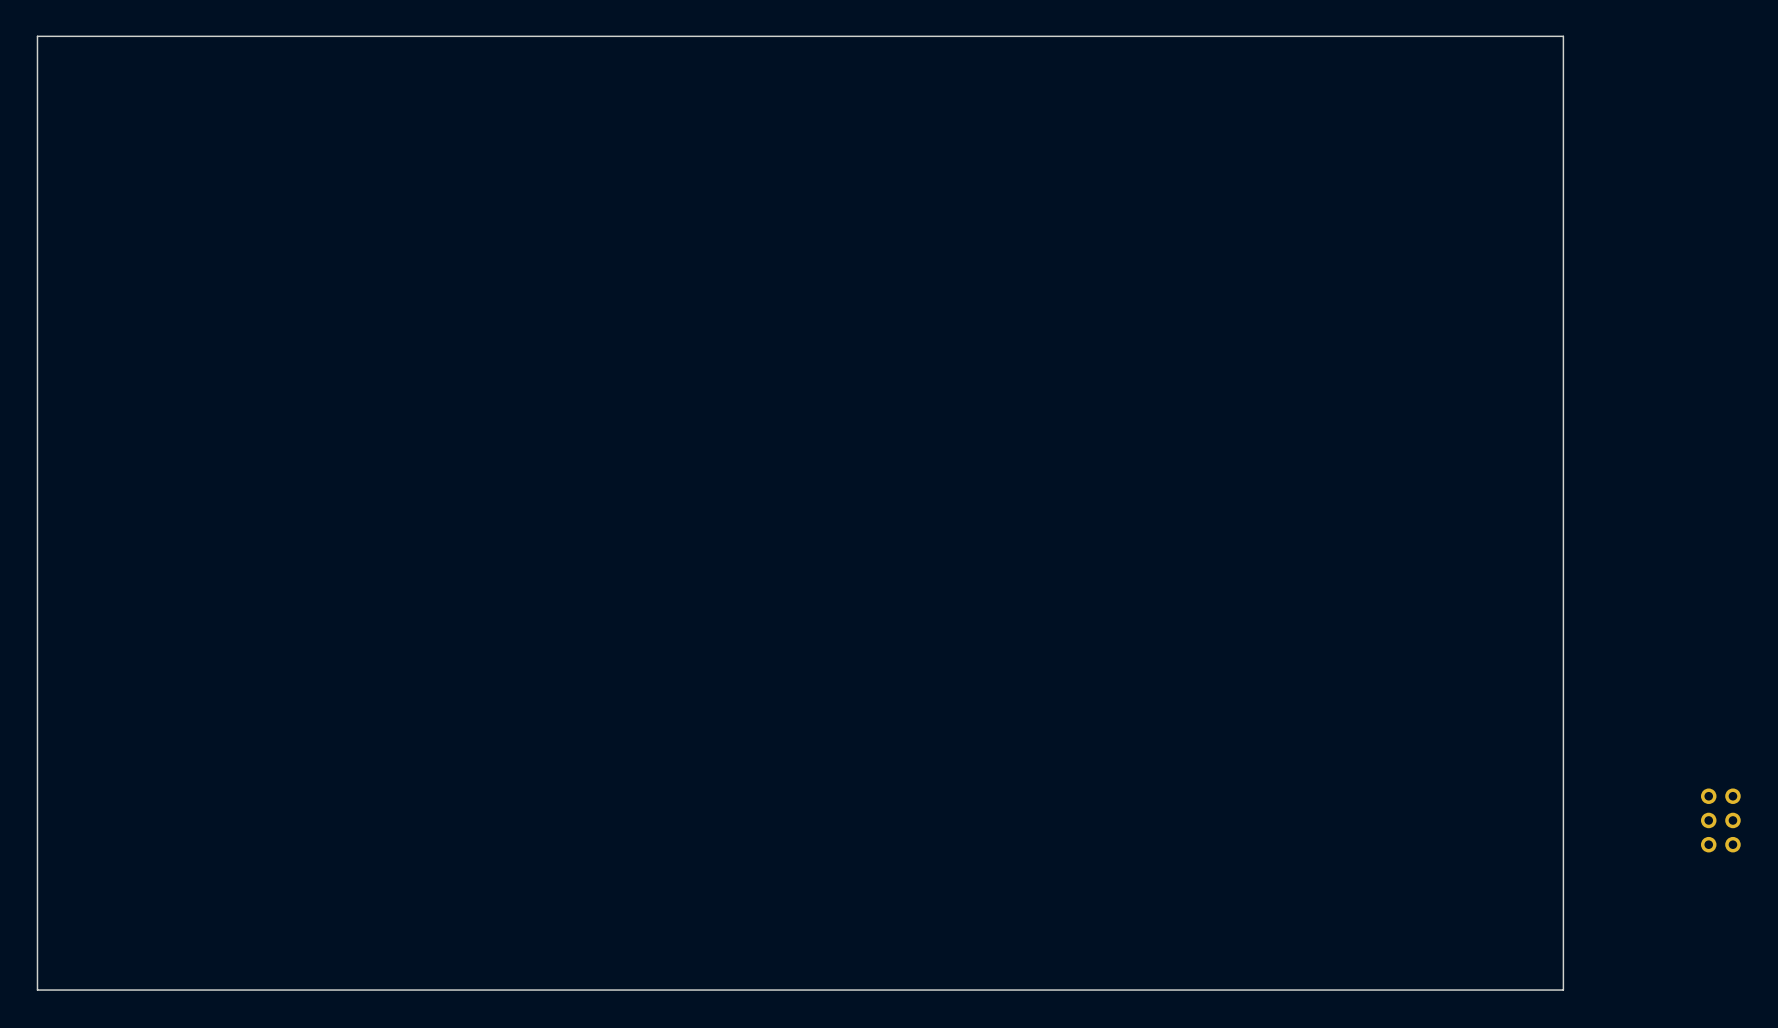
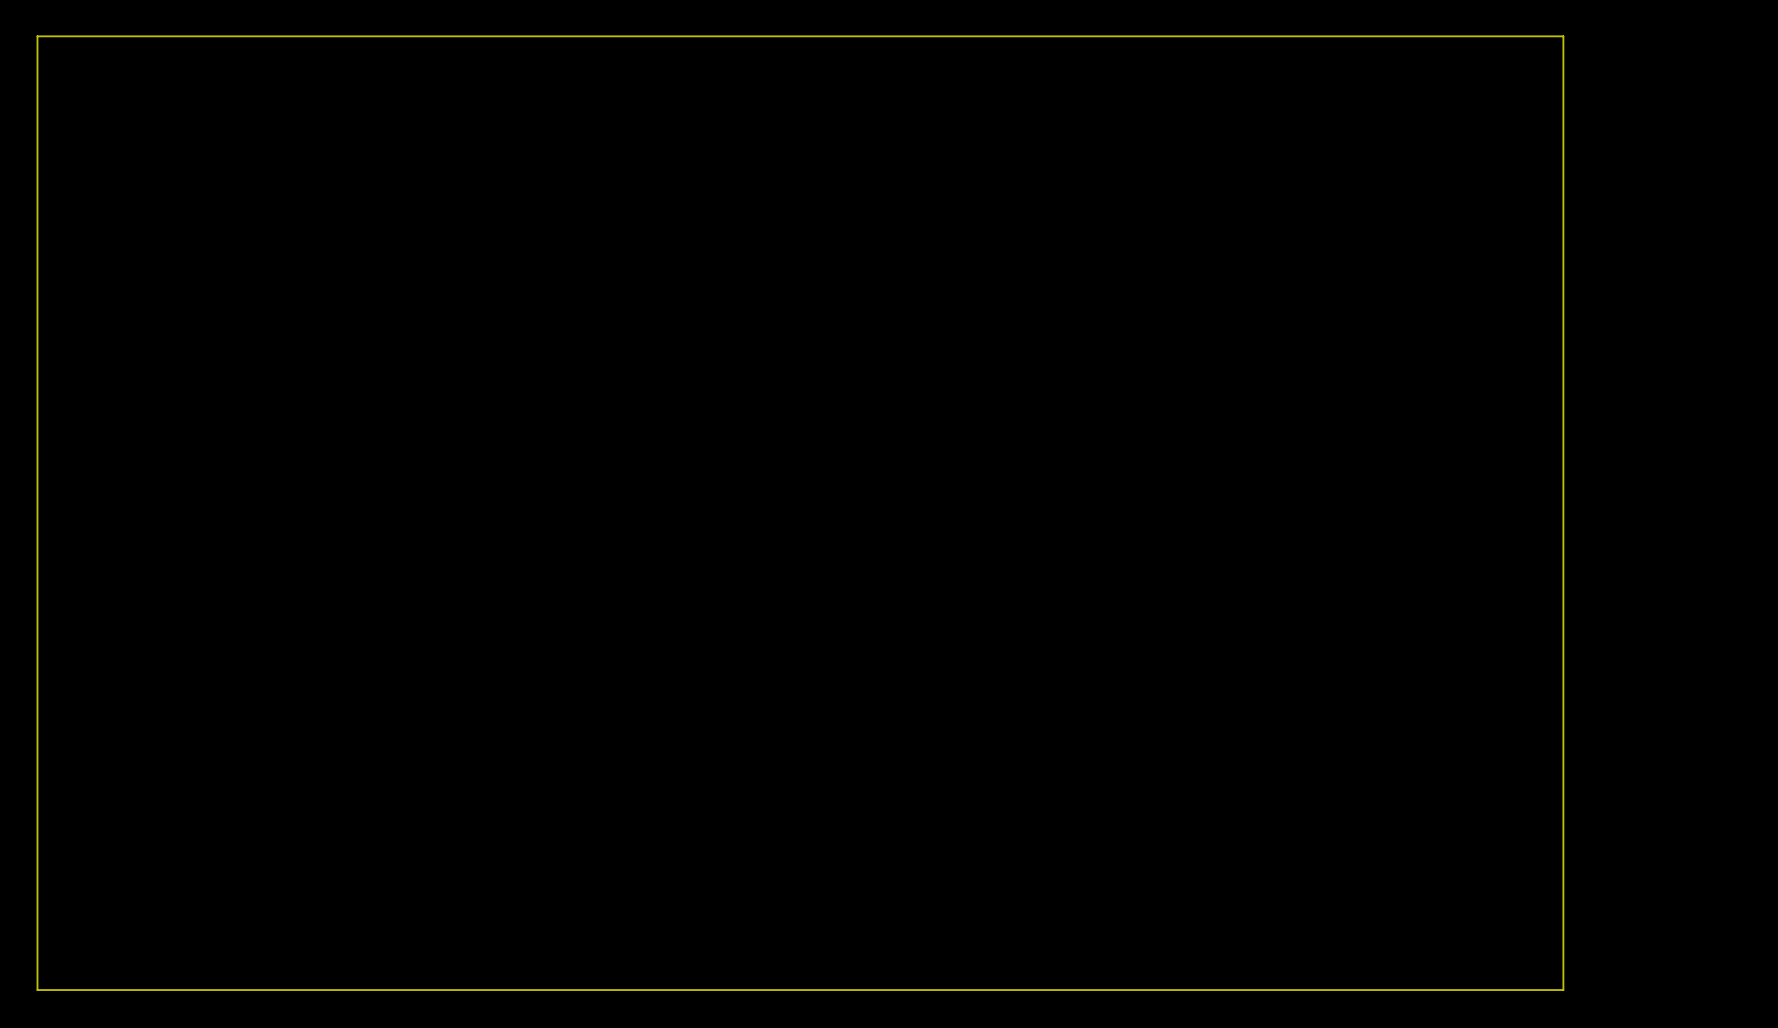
part: (1720, 820) -> none

